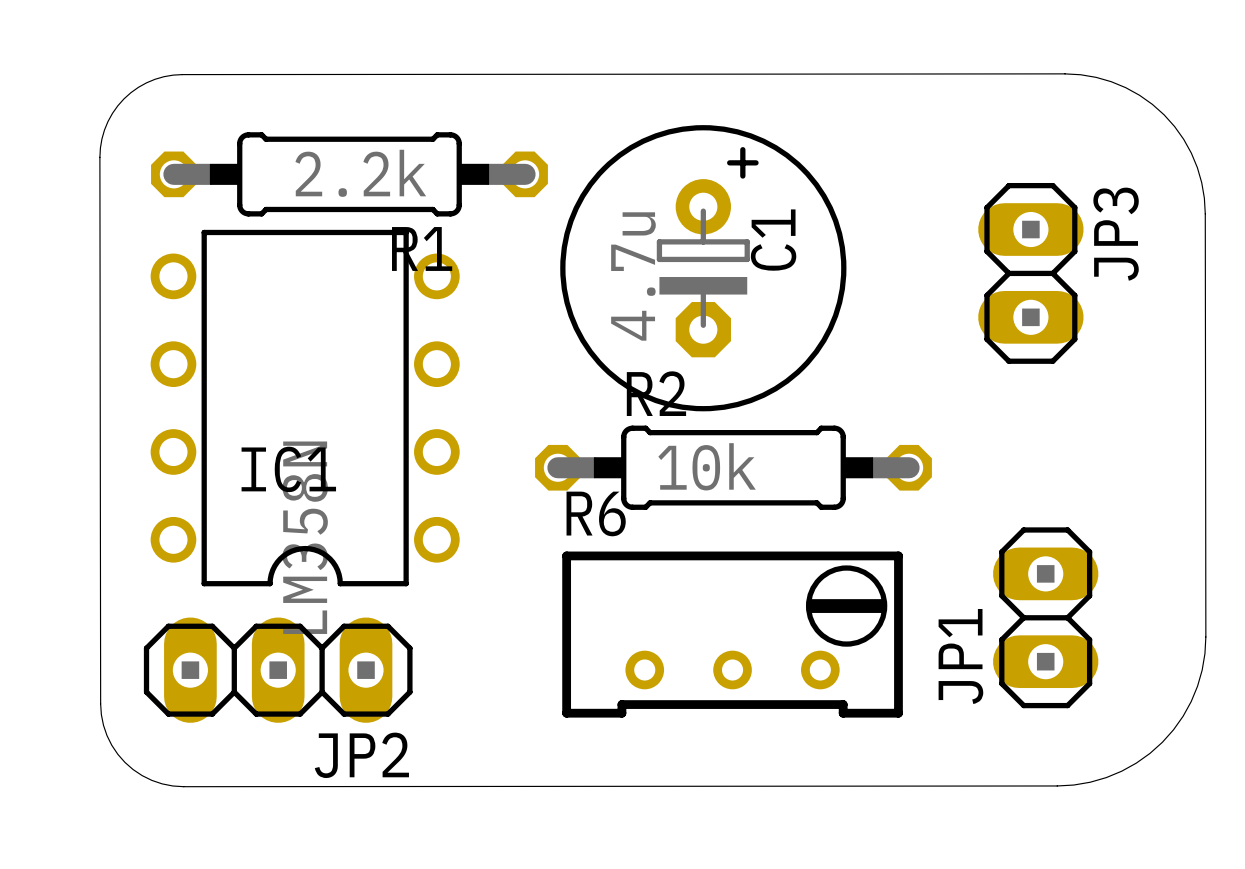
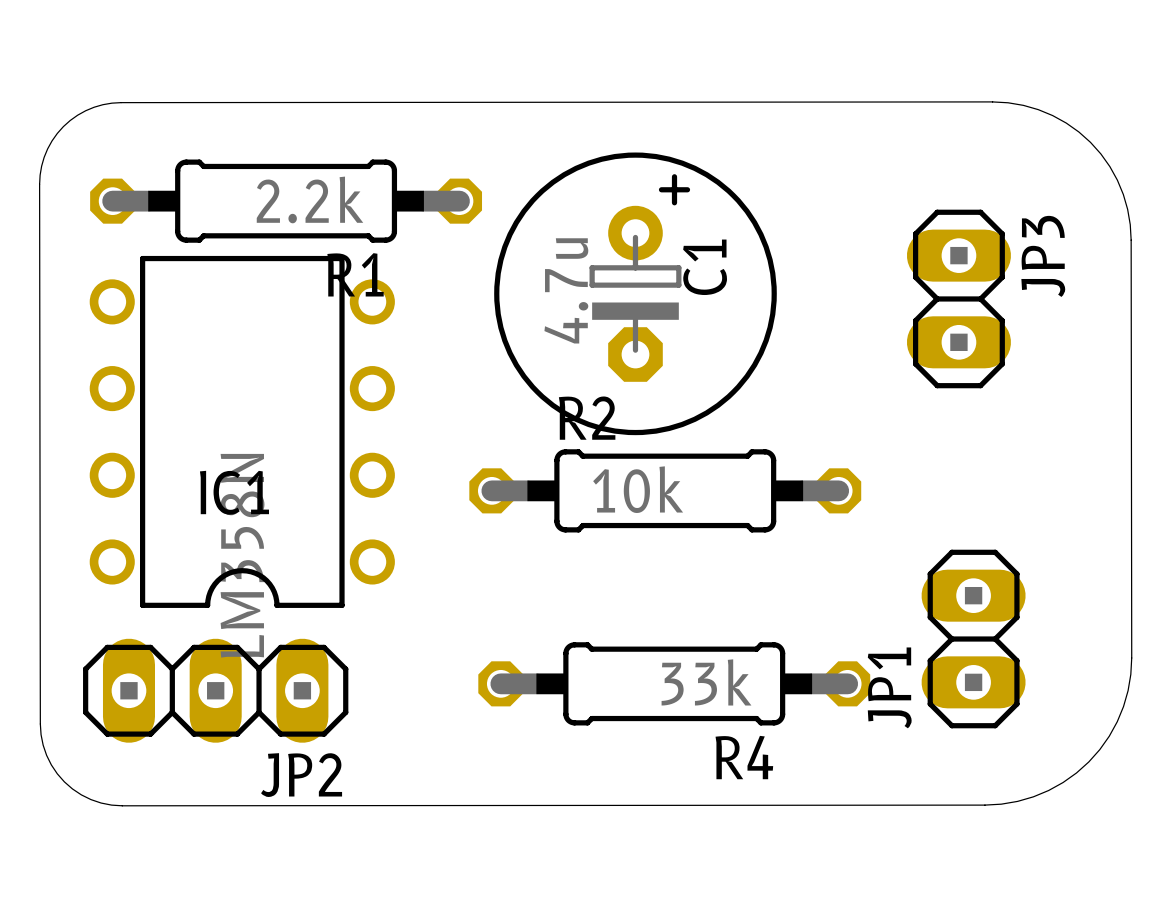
R6: (732, 634) -> none
R4: none -> 33k (674, 683)

